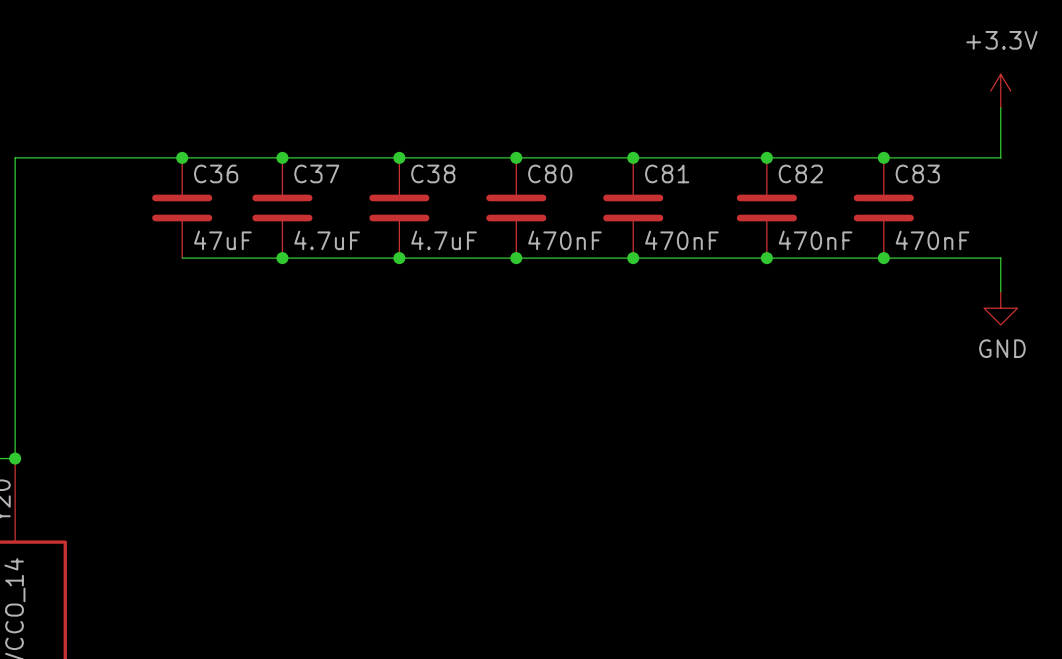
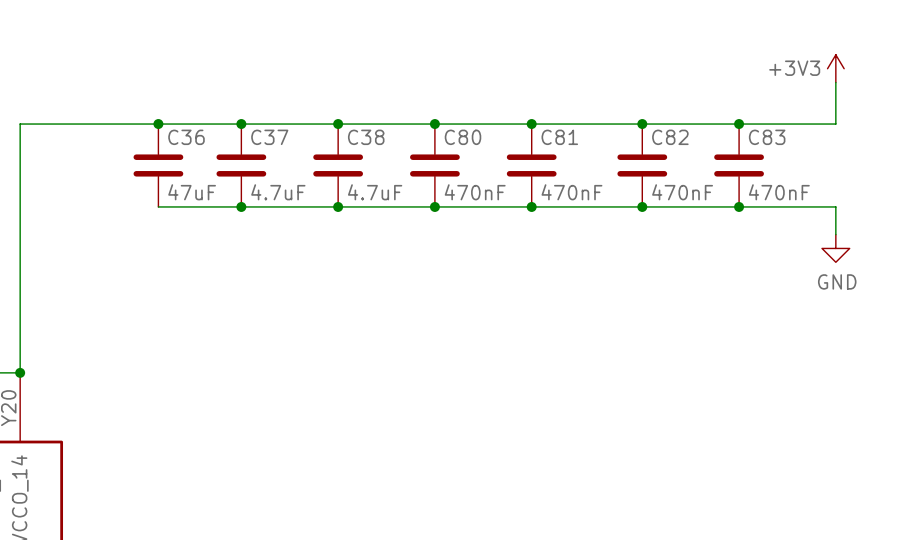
power symbol: +3.3V (1000, 91) -> +3V3 (835, 68)

